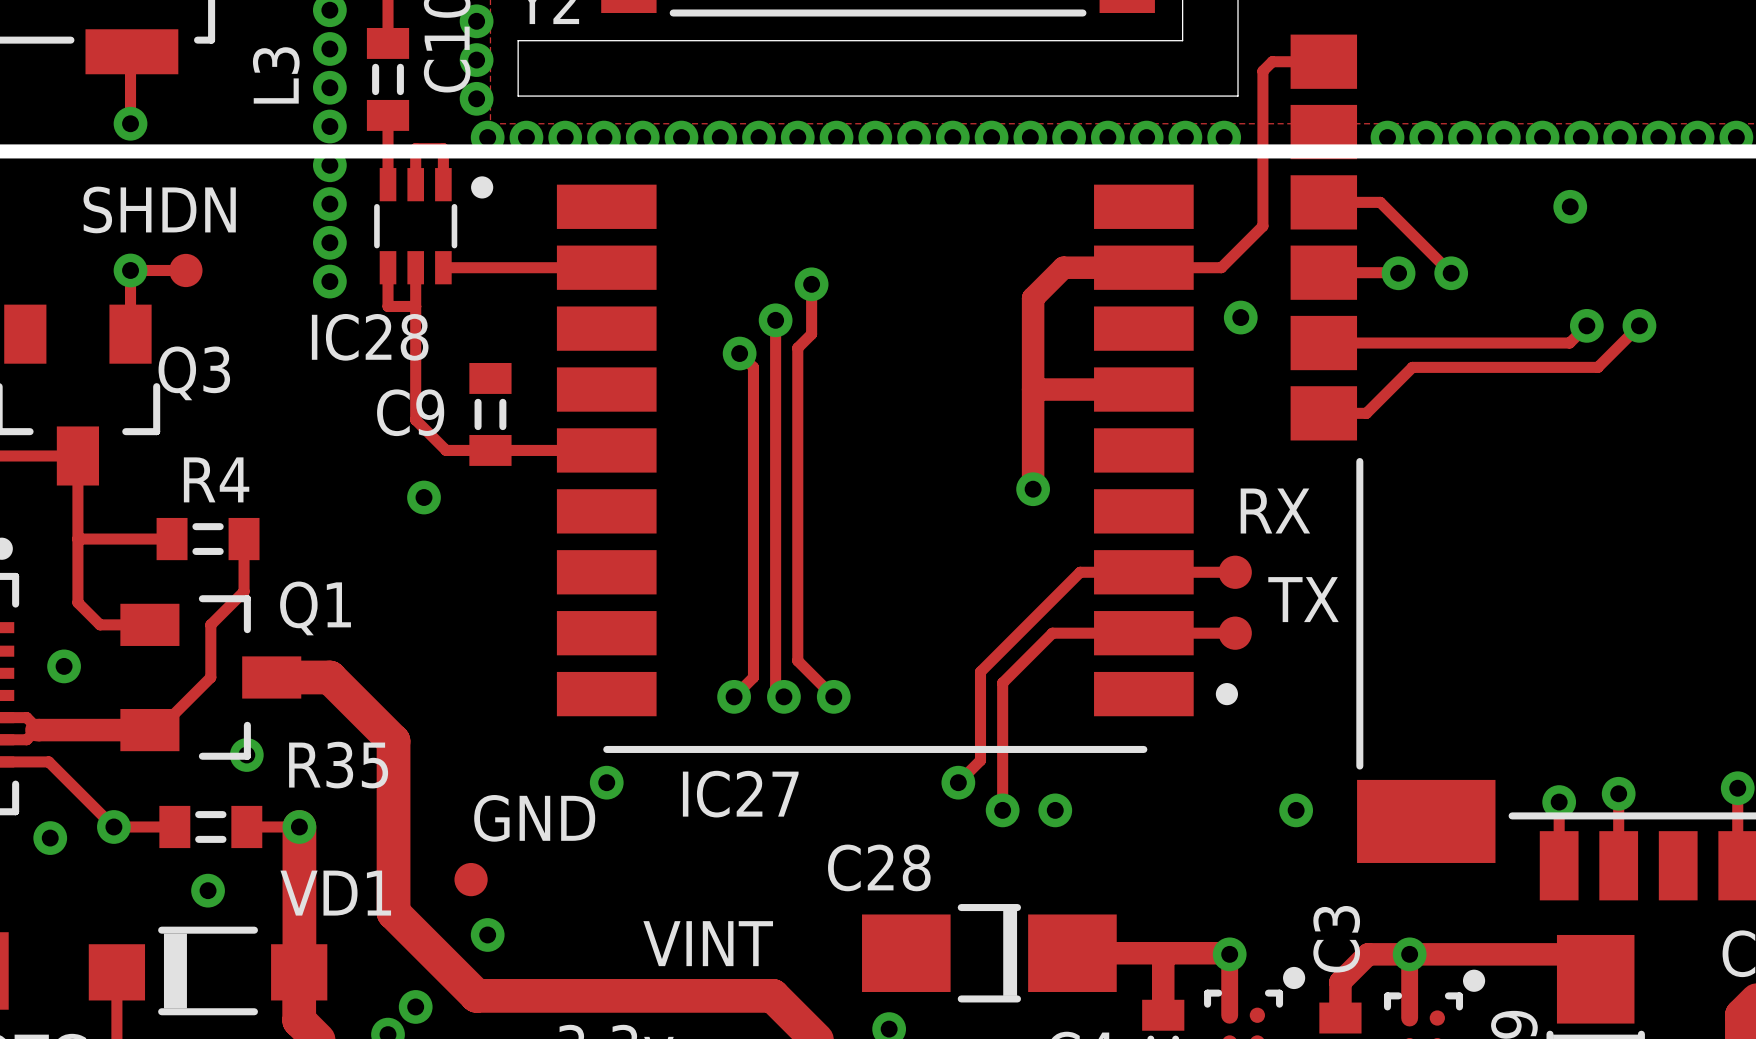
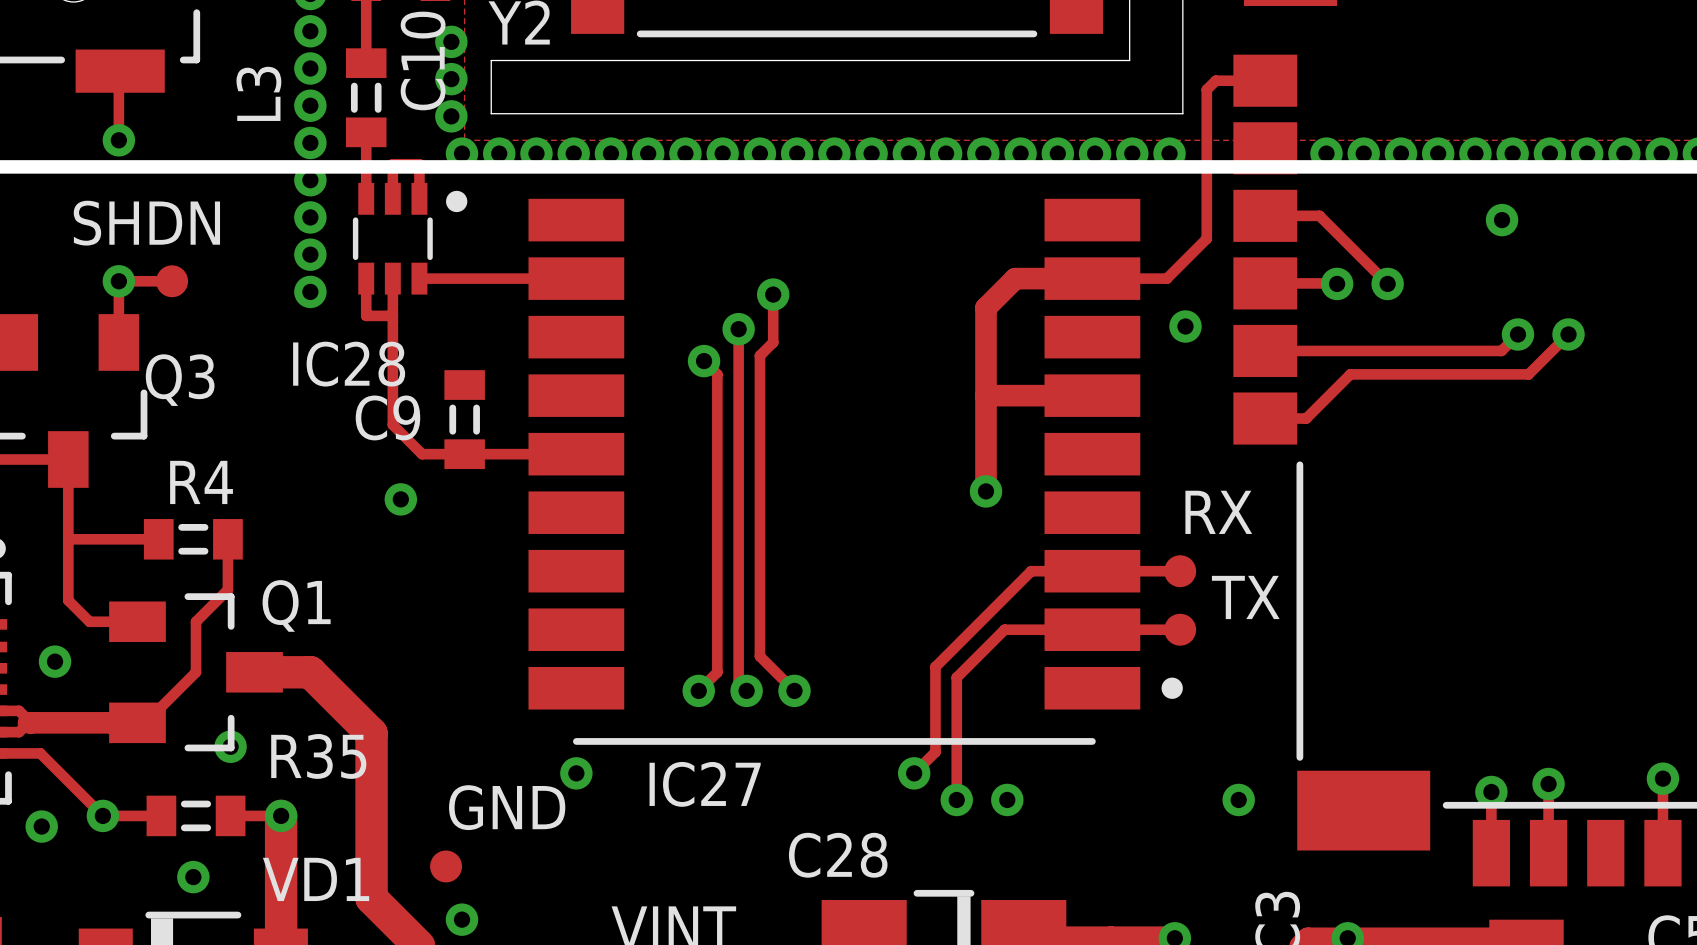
IC28 name position: IC28 (370, 337) -> IC28 (349, 364)

